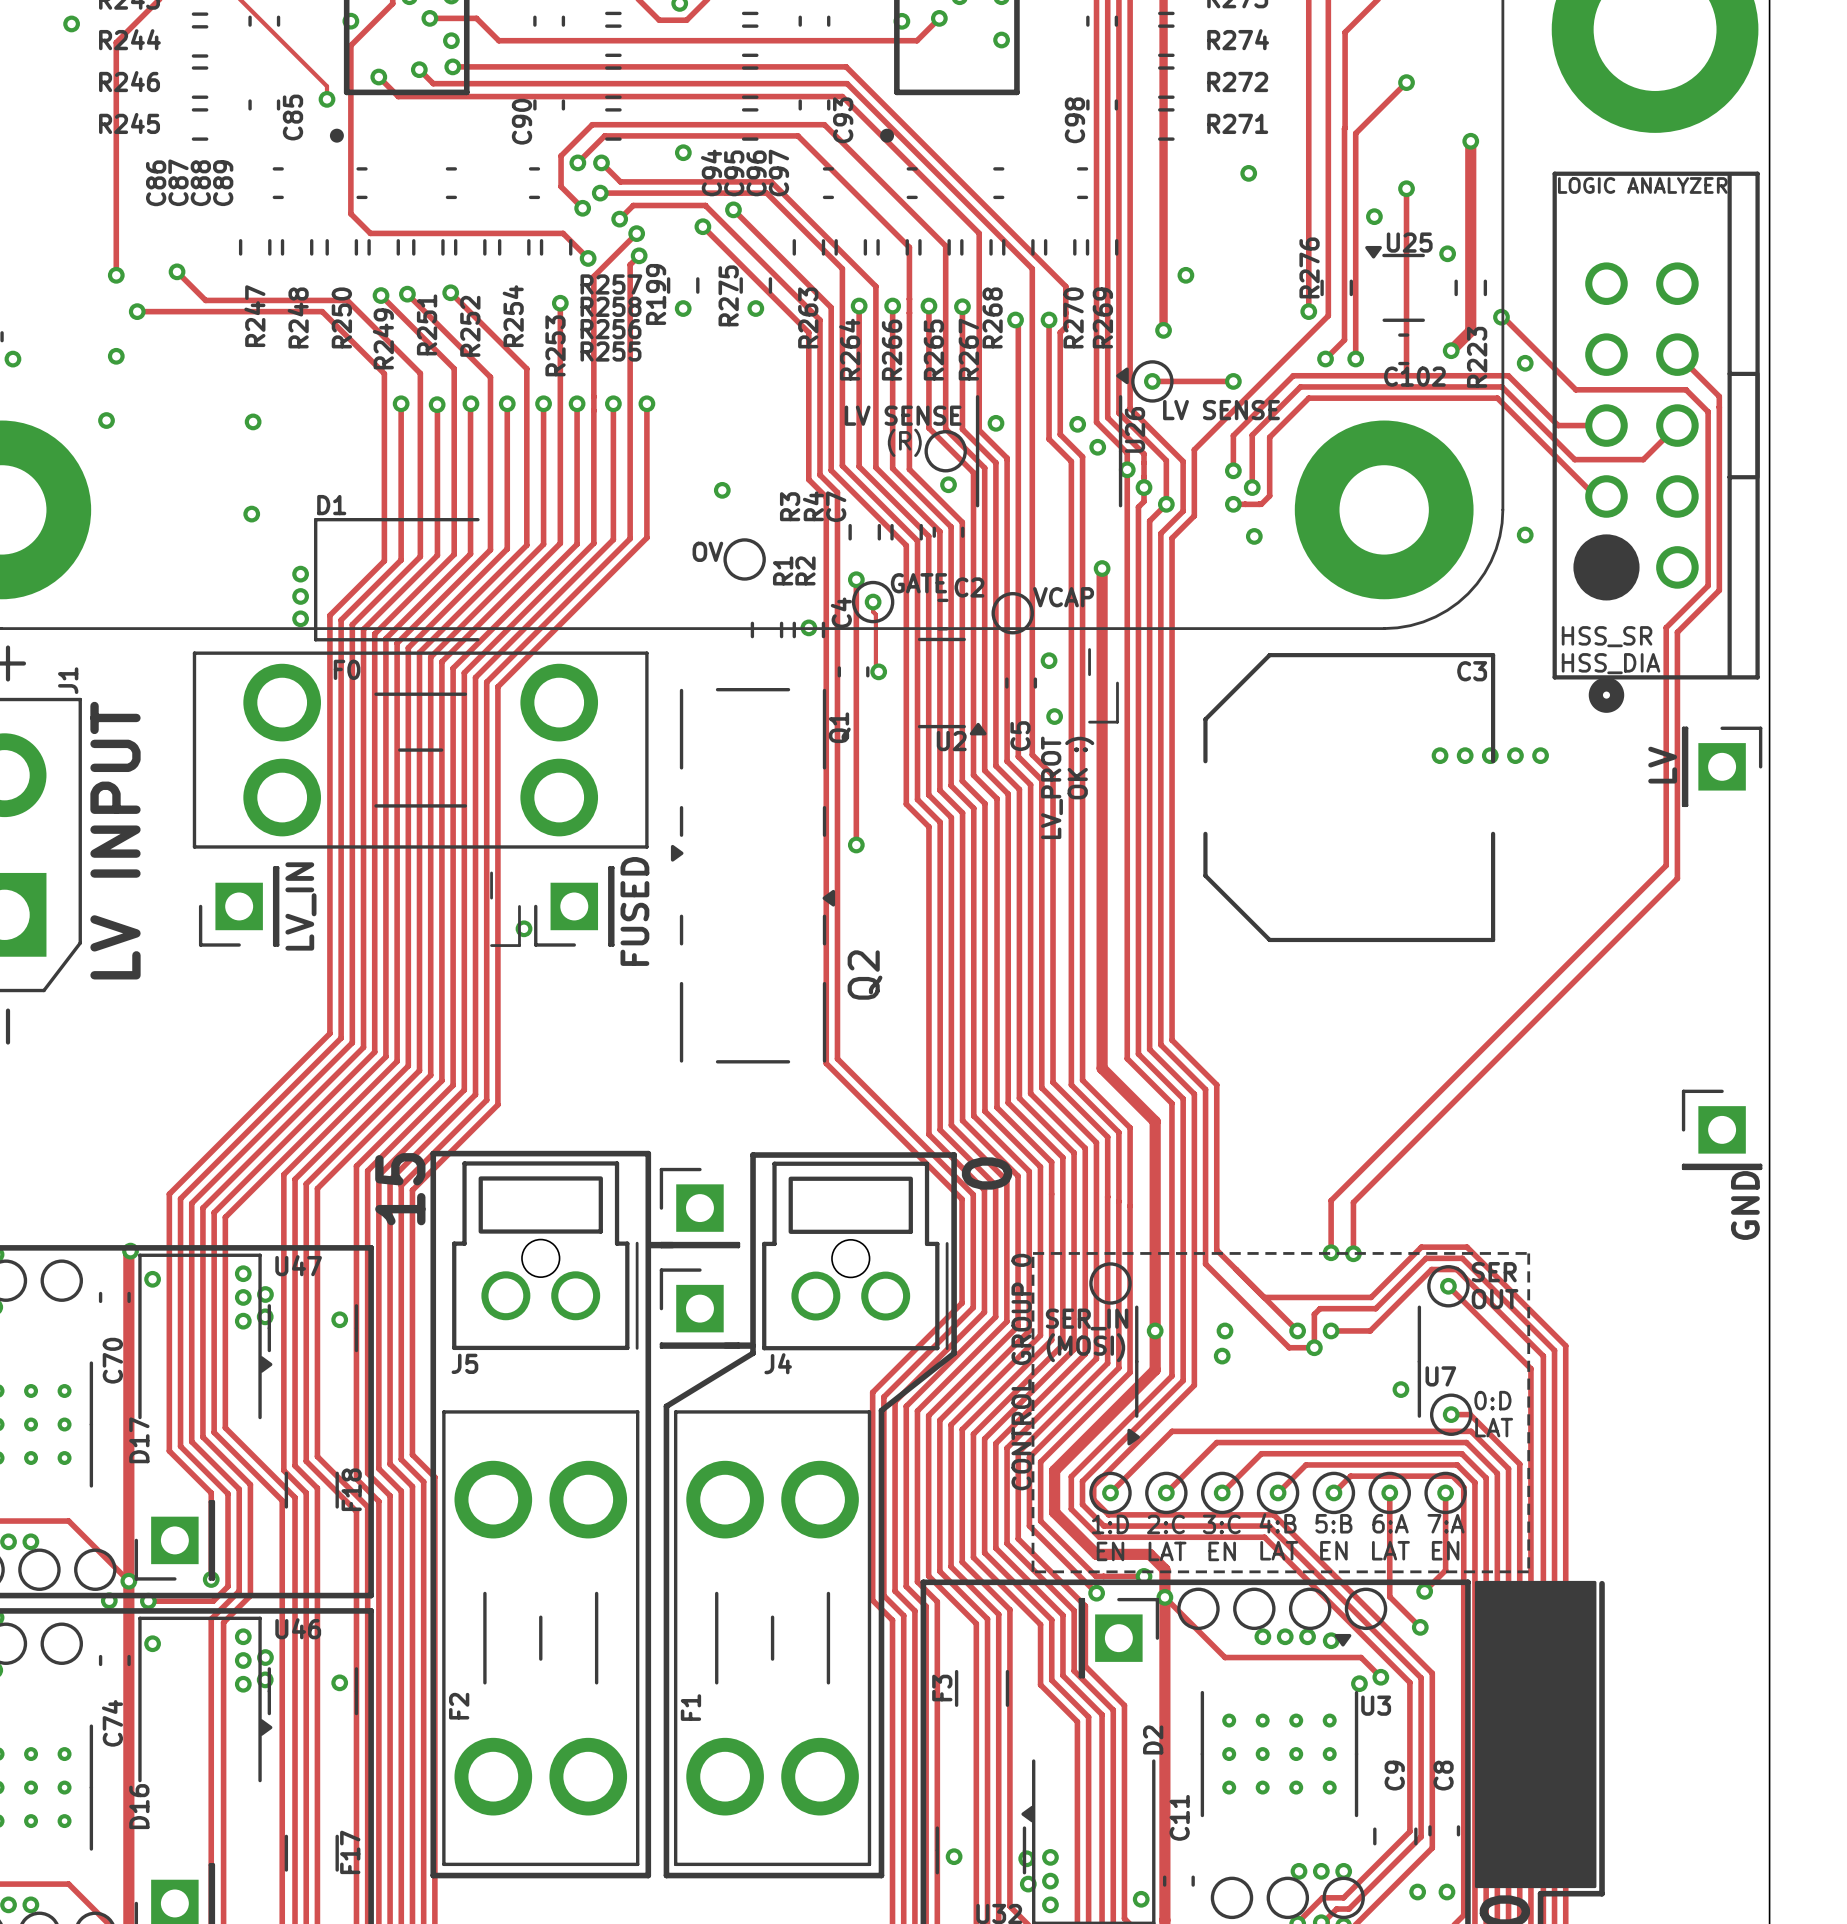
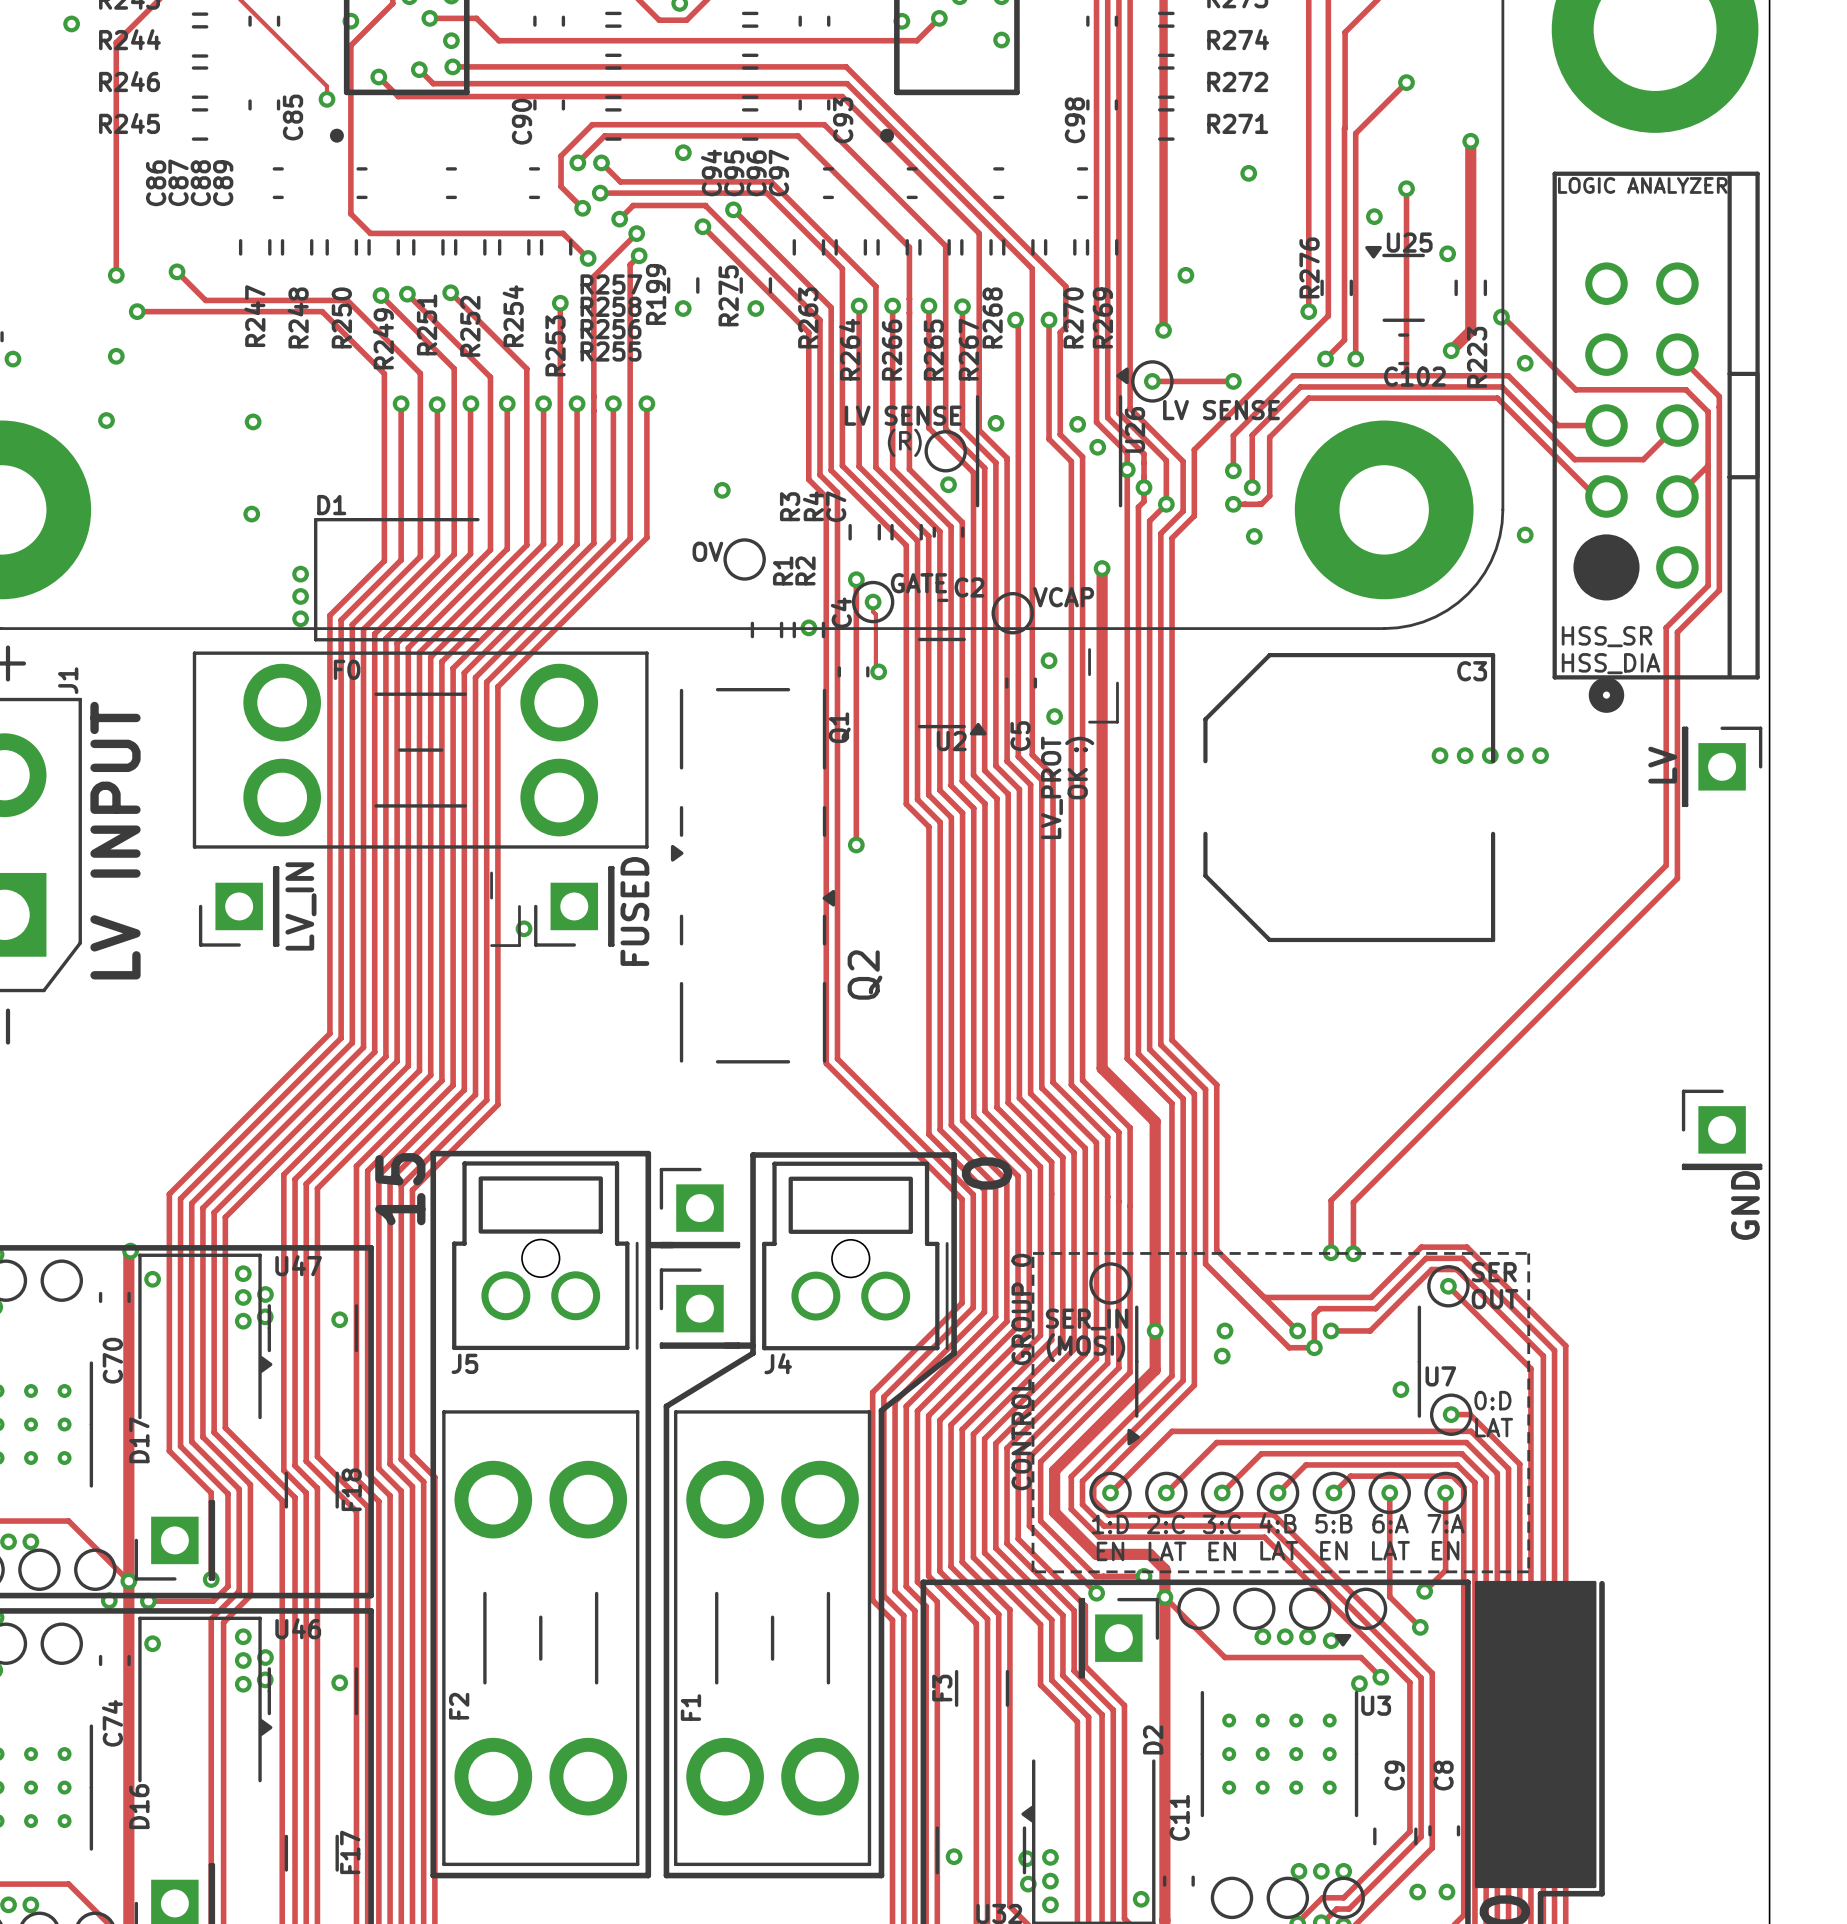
track: none -> (1708, 465) (1677, 496)

